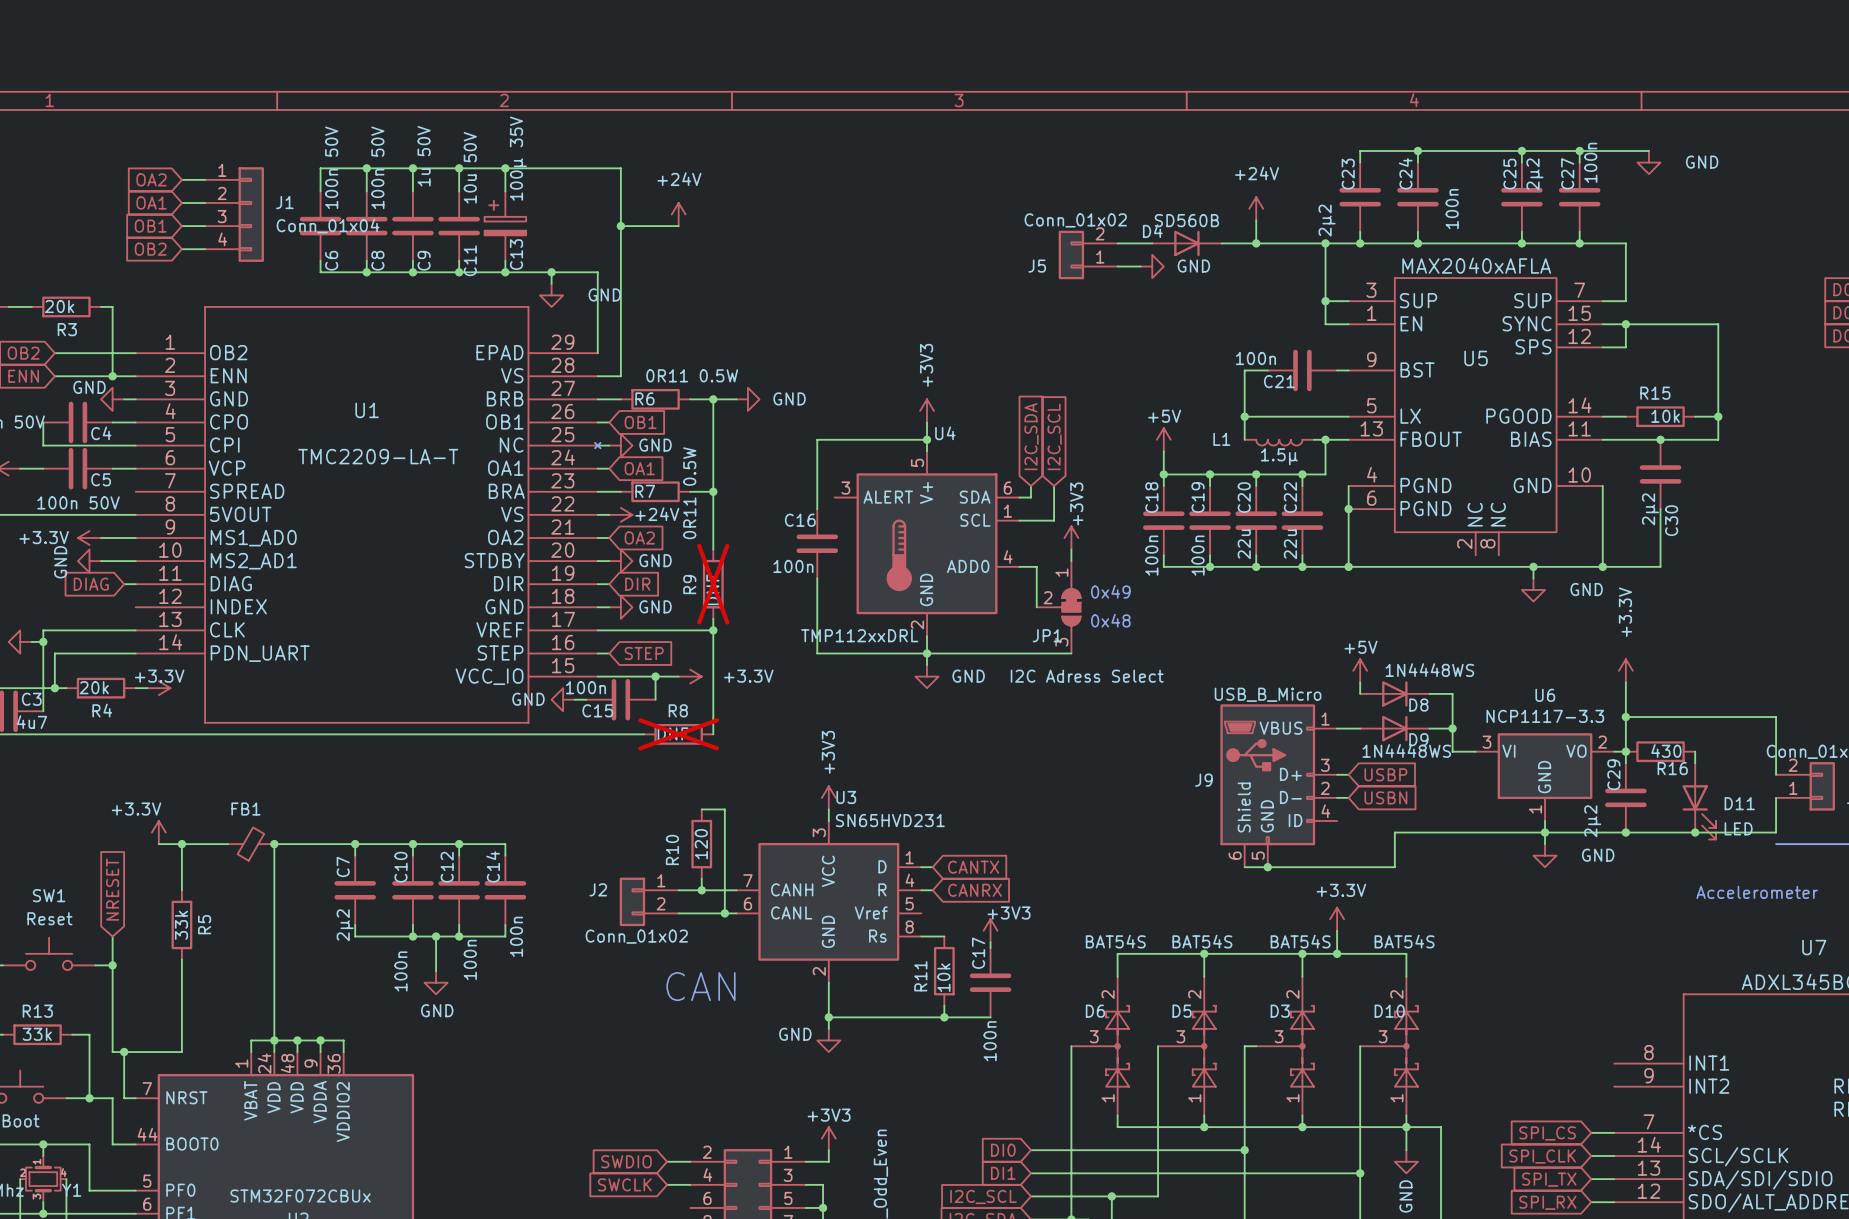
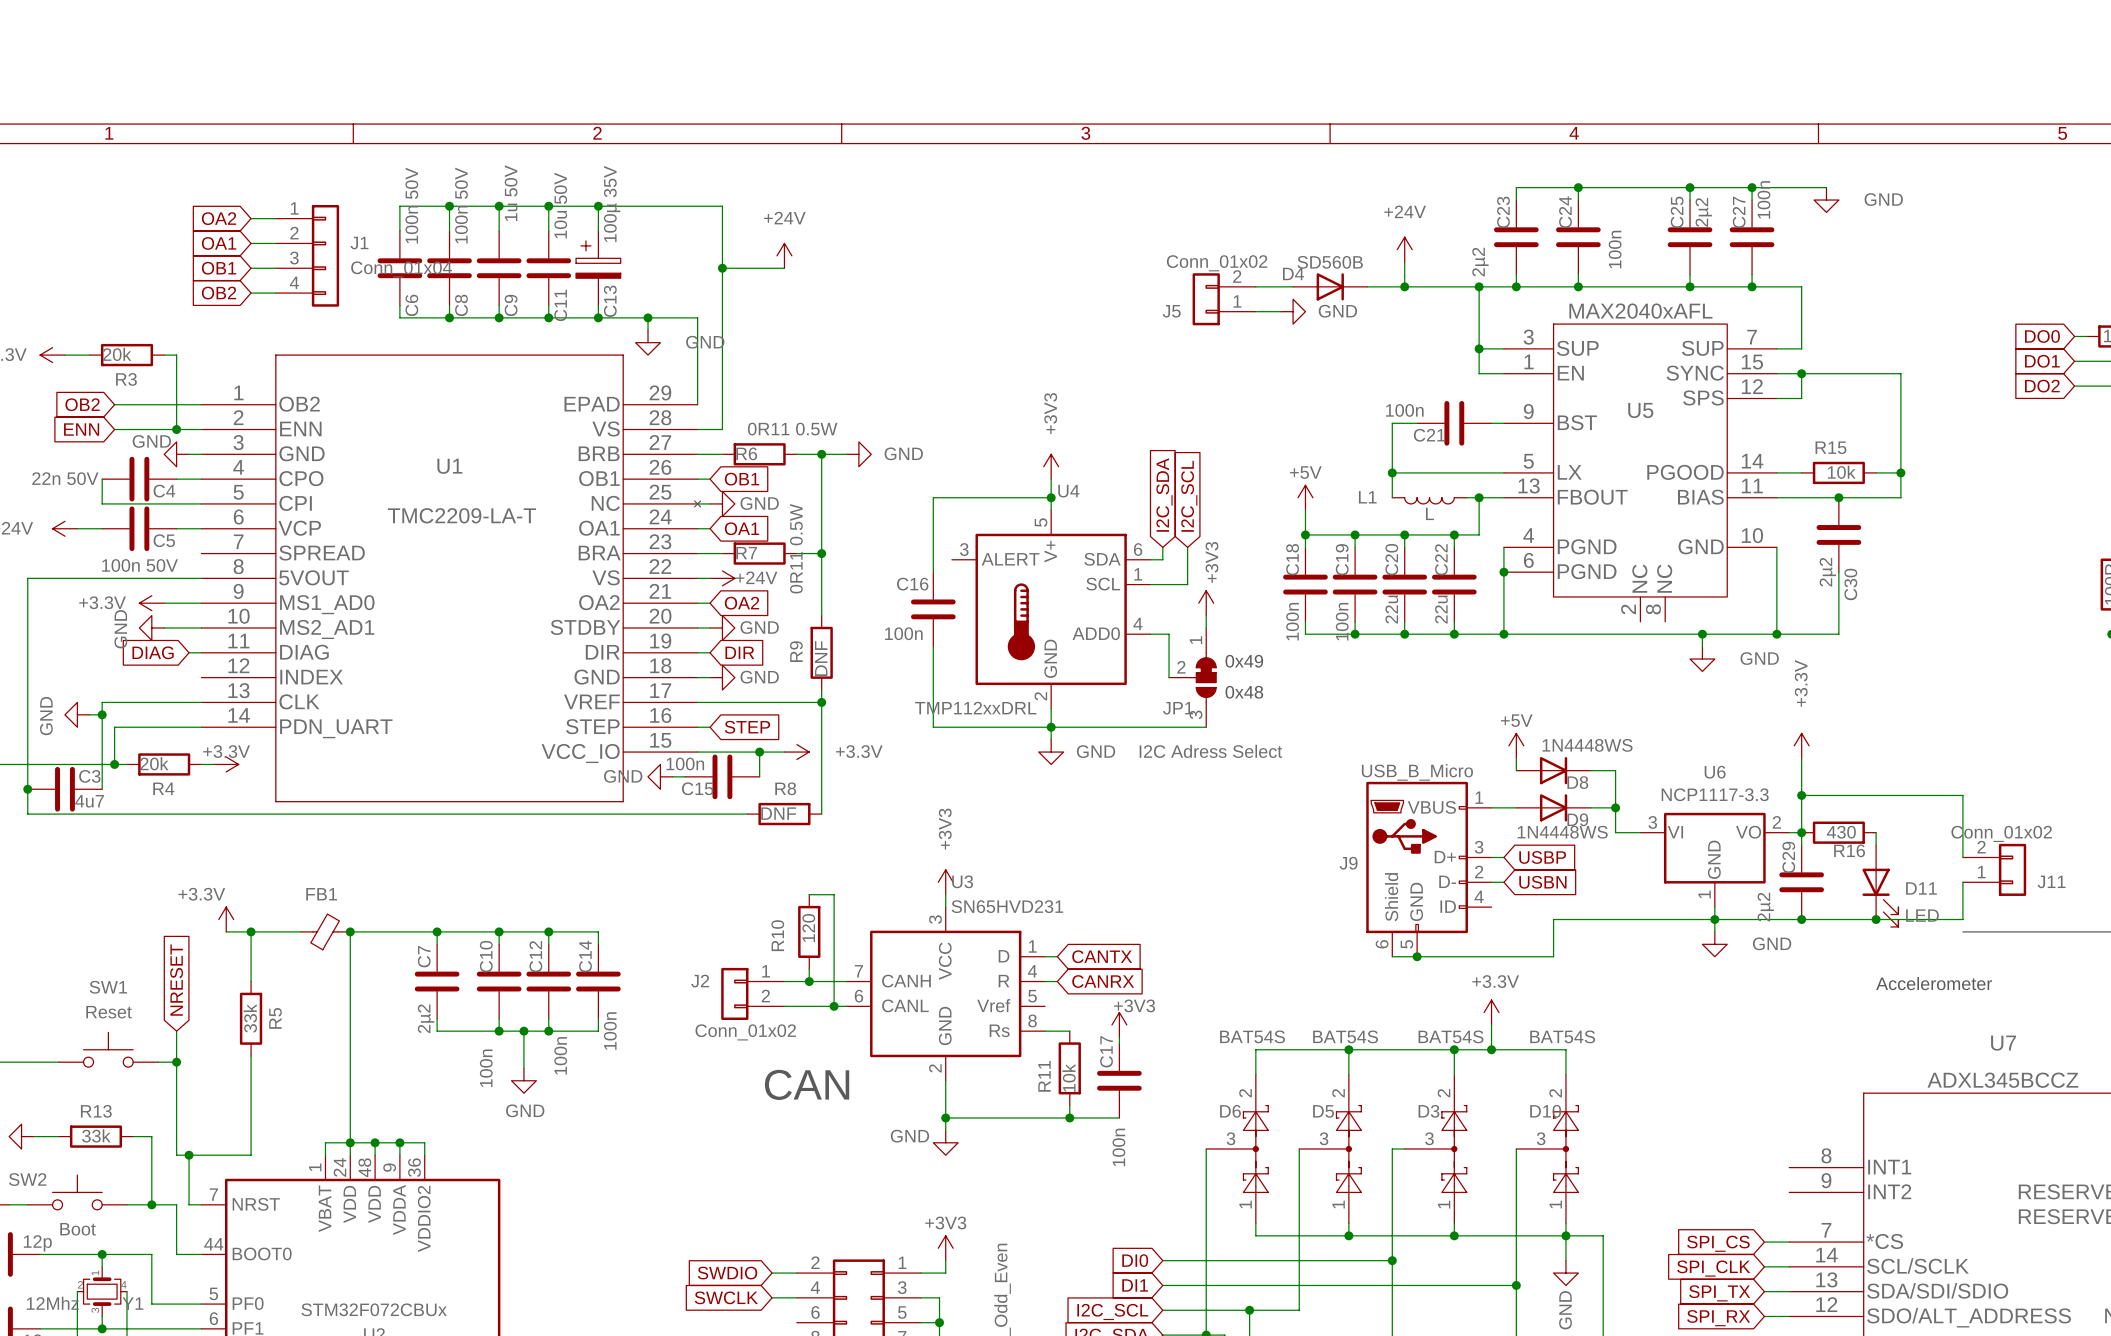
U5 value: MAX2040xAFLA (1476, 265) -> MAX2040xAFL (1640, 311)
L1 value: 1.5µ (1279, 456) -> L (1429, 513)
R9 do-not-place cross: (713, 584) -> none
R8 do-not-place cross: (678, 734) -> none

